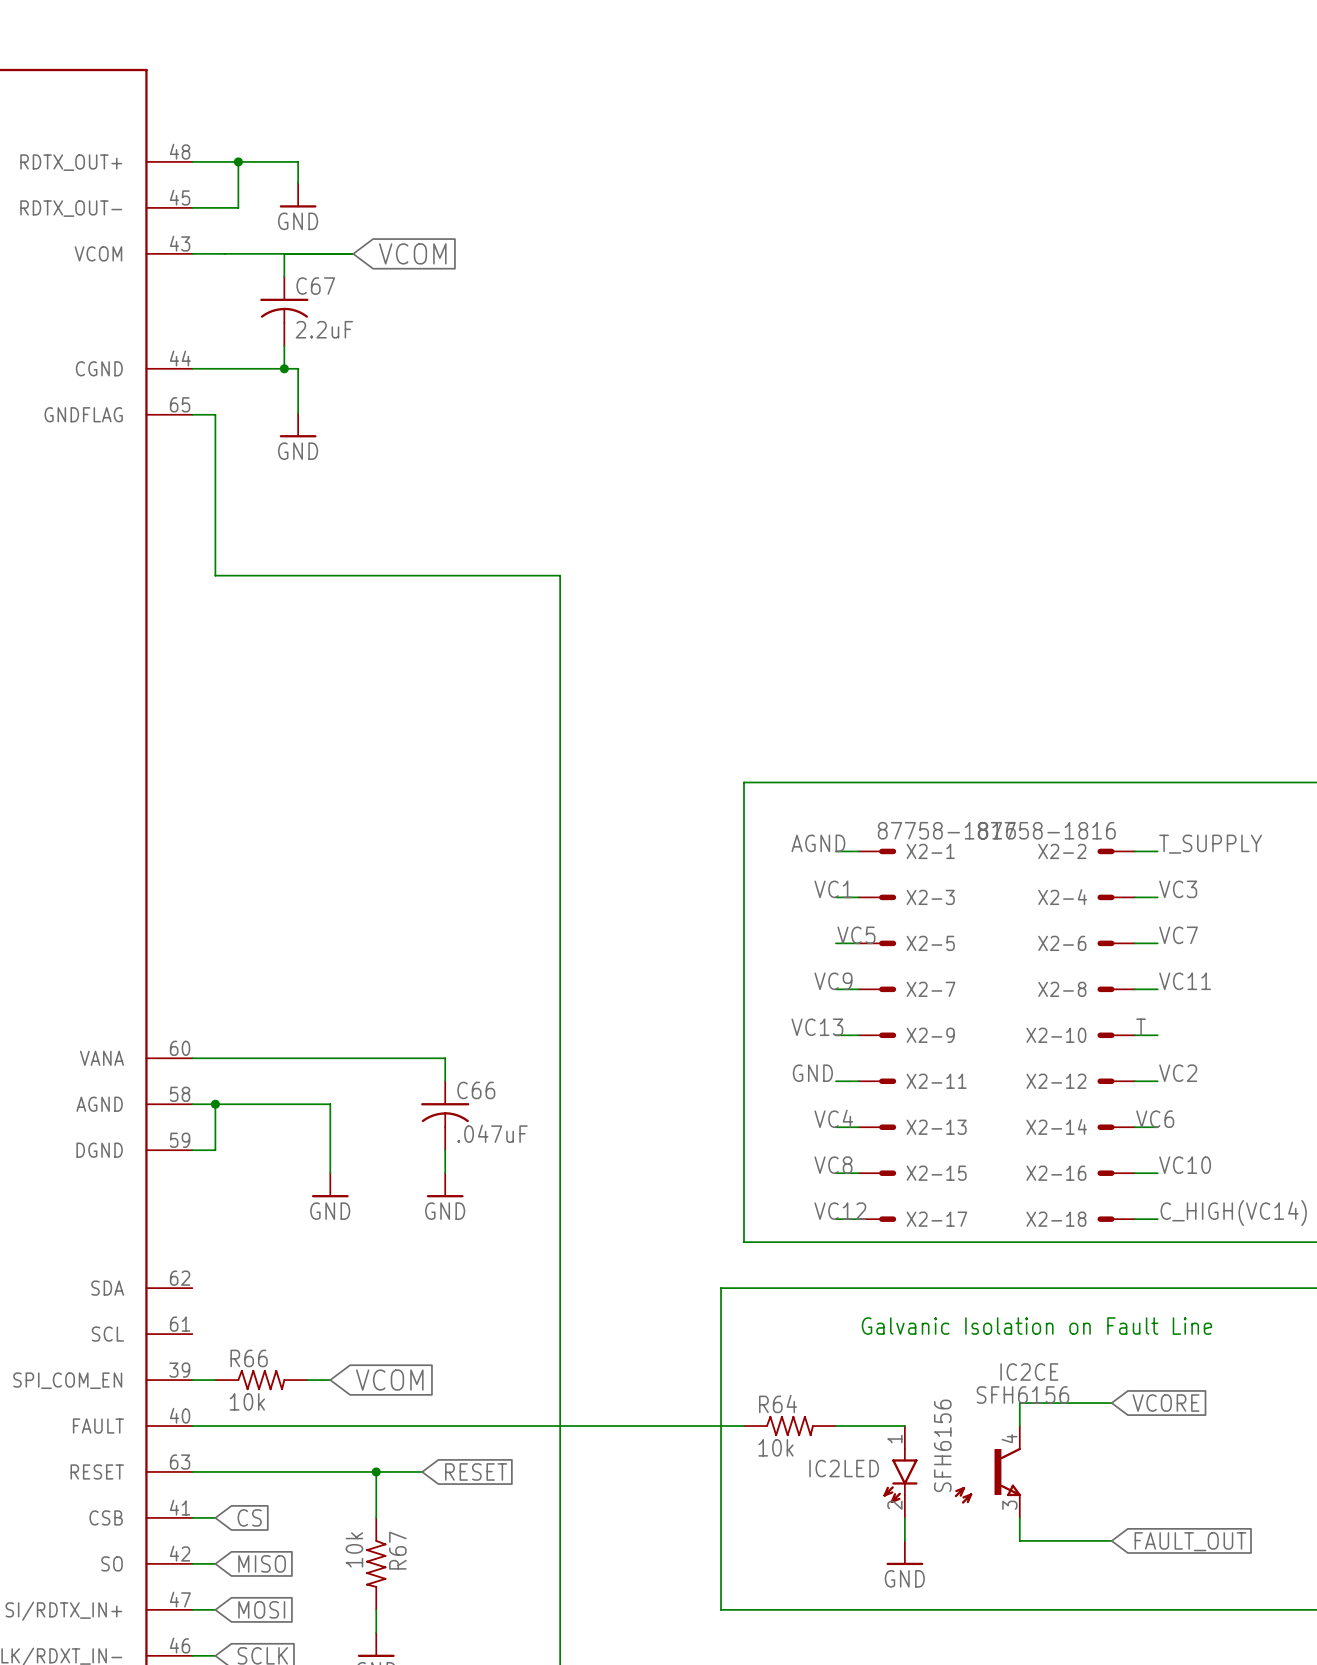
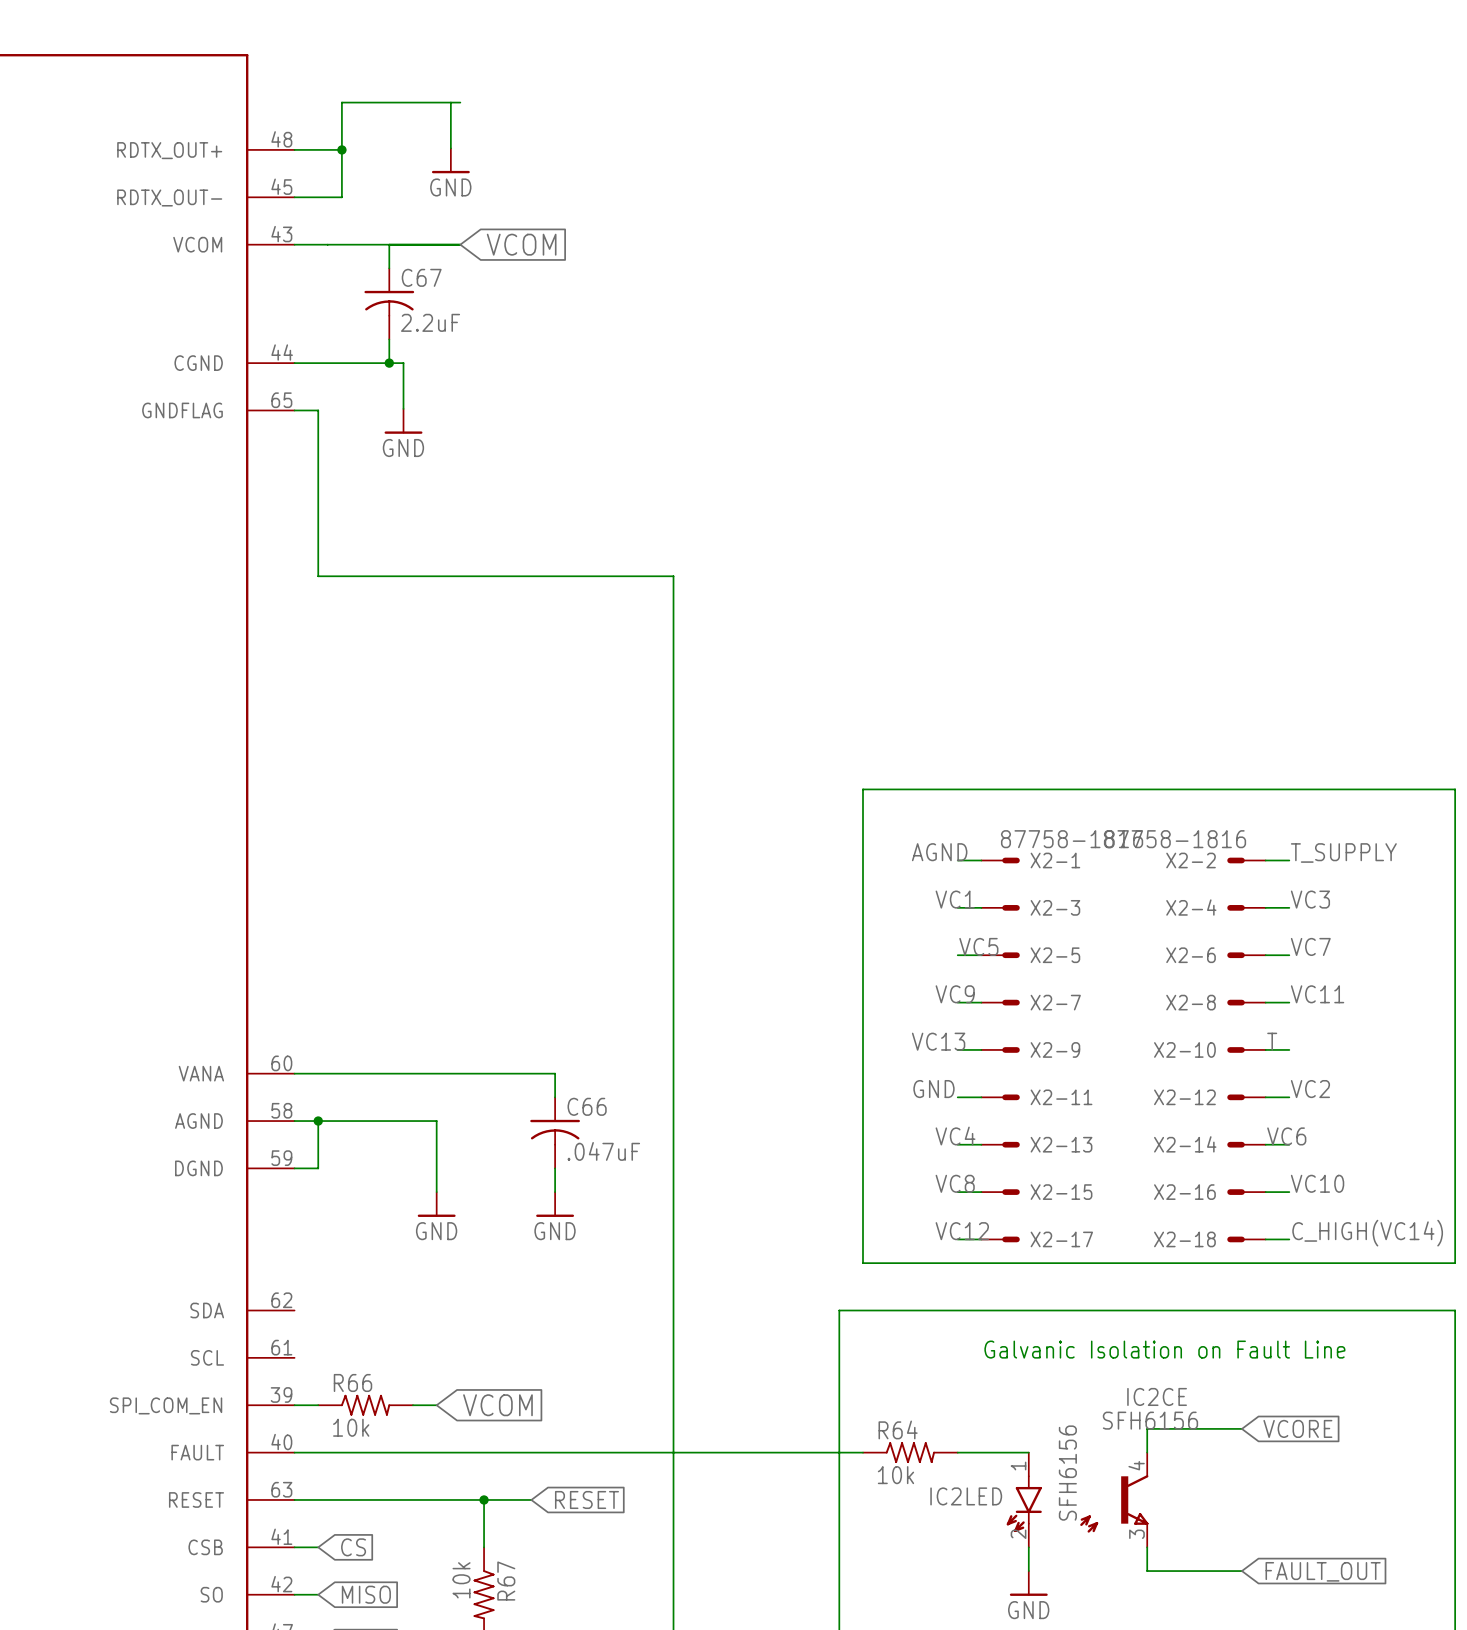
wire: none -> (450, 102) (450, 148)
wire: (238, 161) (298, 161) (298, 183) -> (341, 149) (341, 102) (460, 102)
power symbol position: GND (298, 195) -> GND (450, 160)

